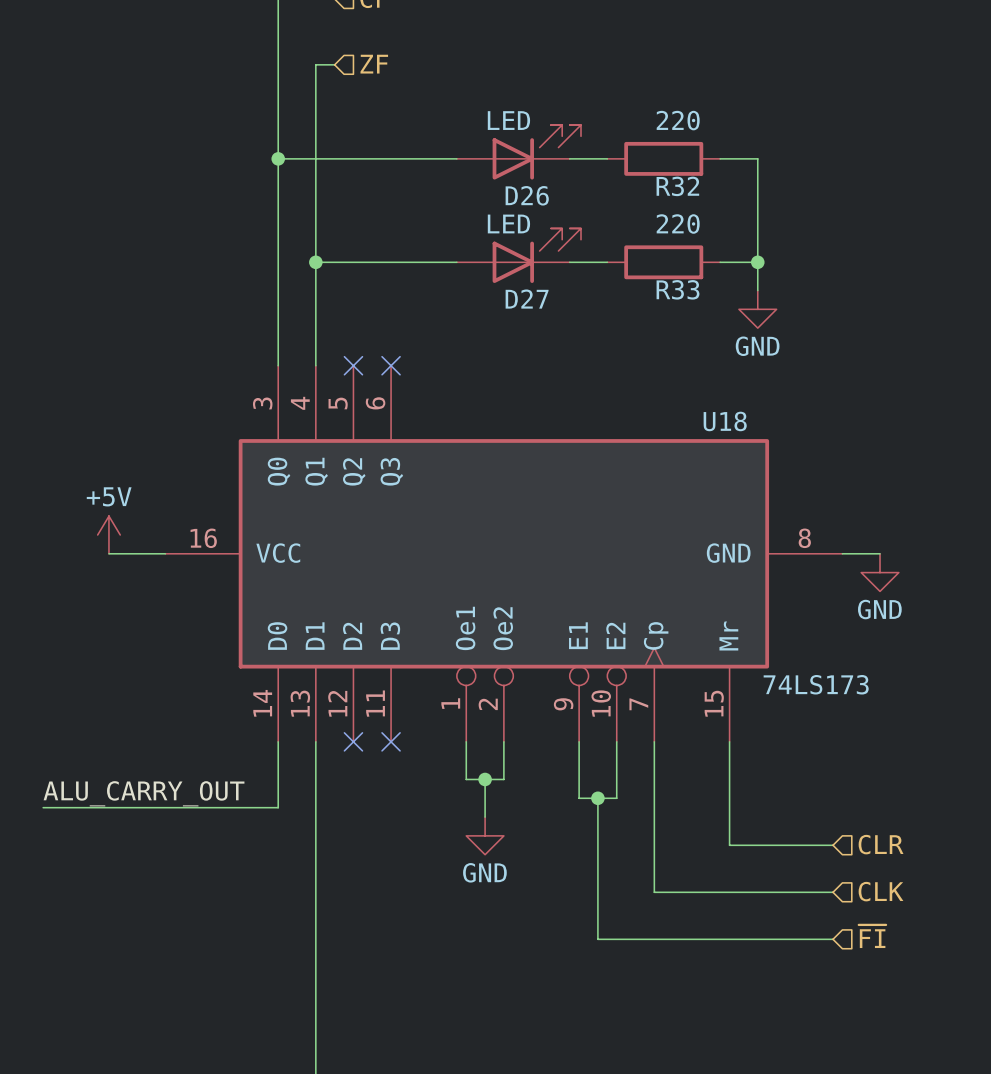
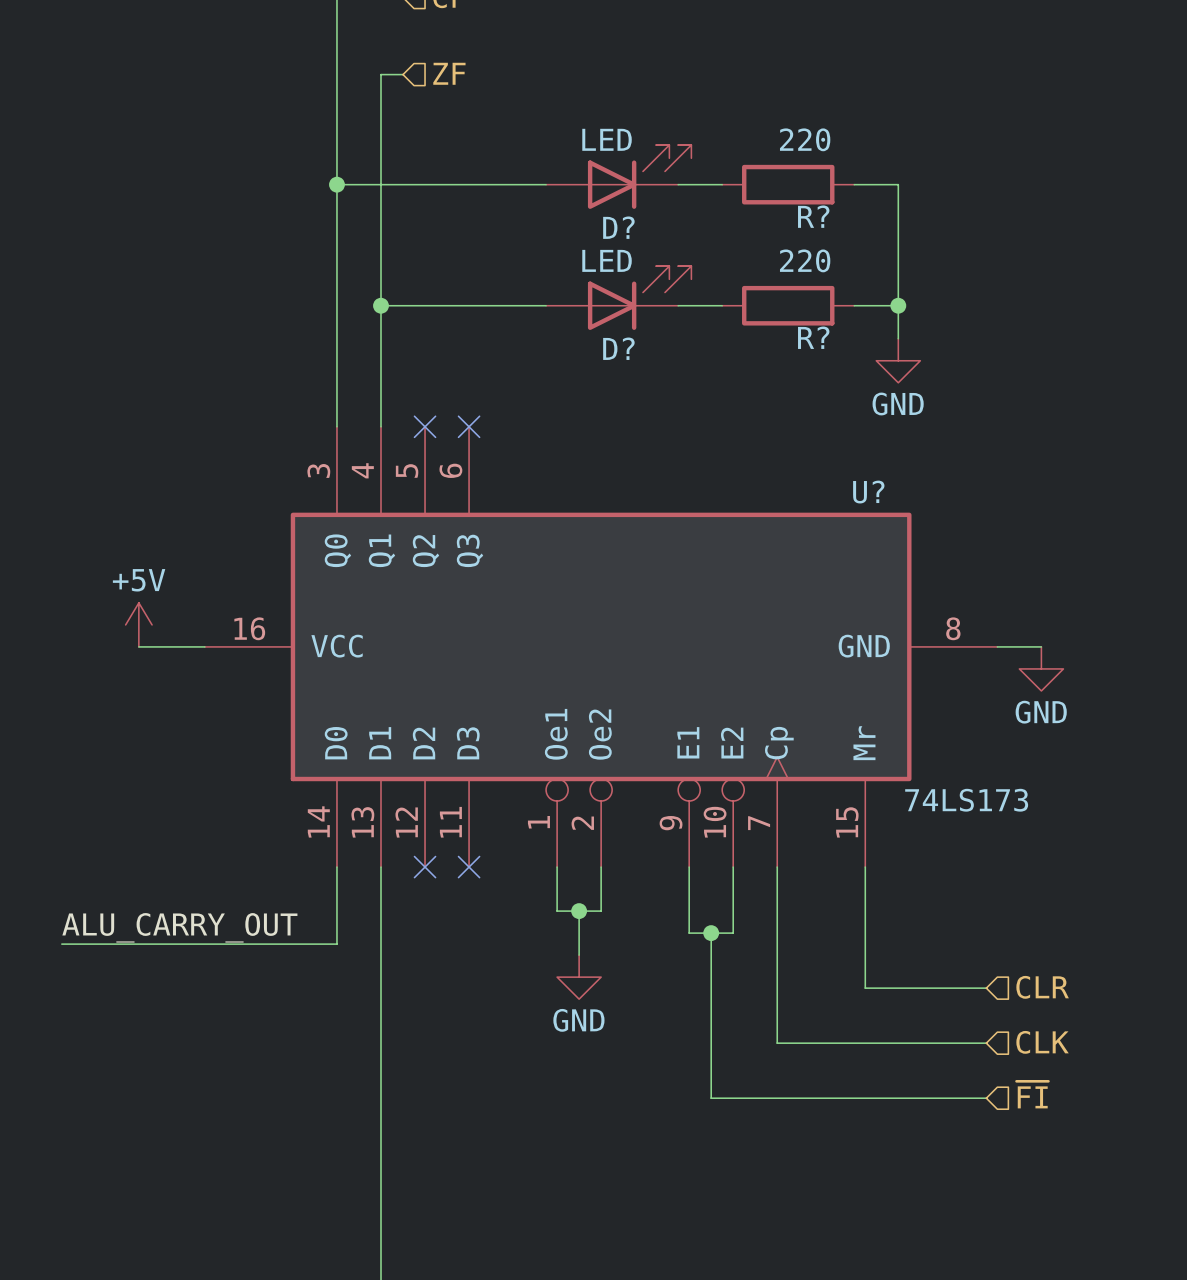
R32 name: R32 (677, 186) -> R? (813, 216)
D26 name: D26 (527, 195) -> D? (618, 227)
R33 name: R33 (677, 289) -> R? (813, 337)
D27 name: D27 (527, 299) -> D? (618, 348)
U18 name: U18 (725, 421) -> U? (868, 492)

